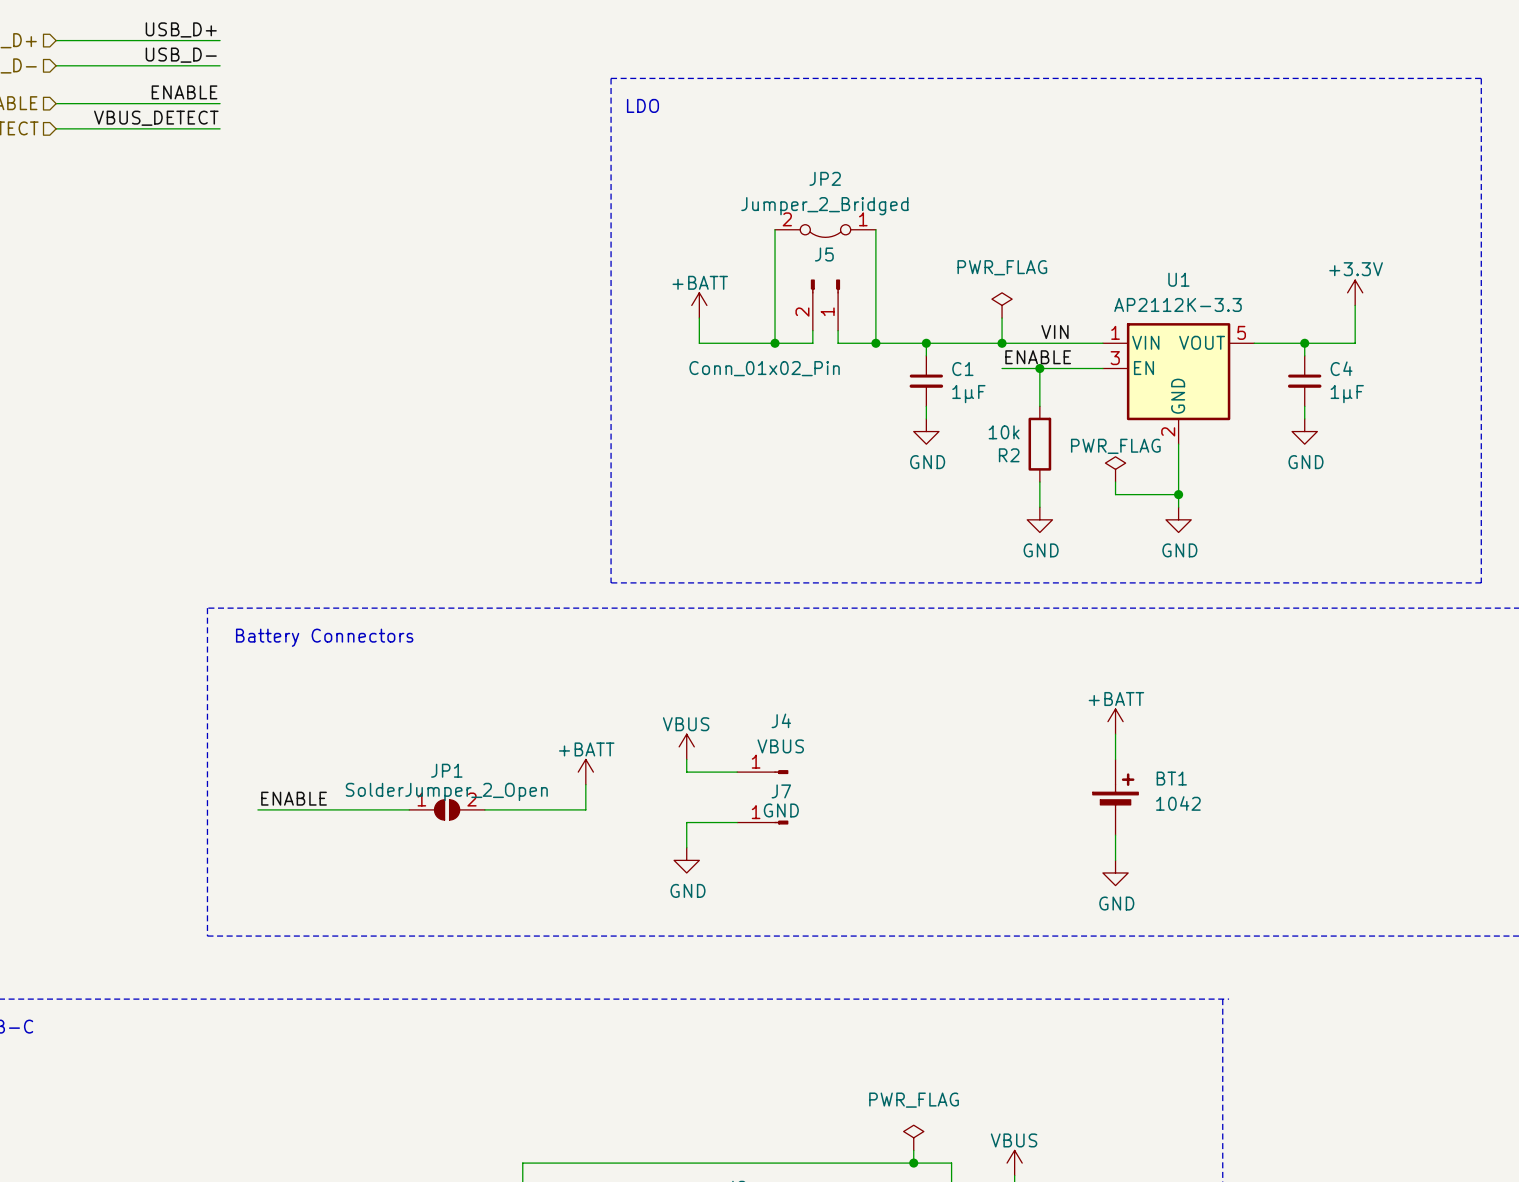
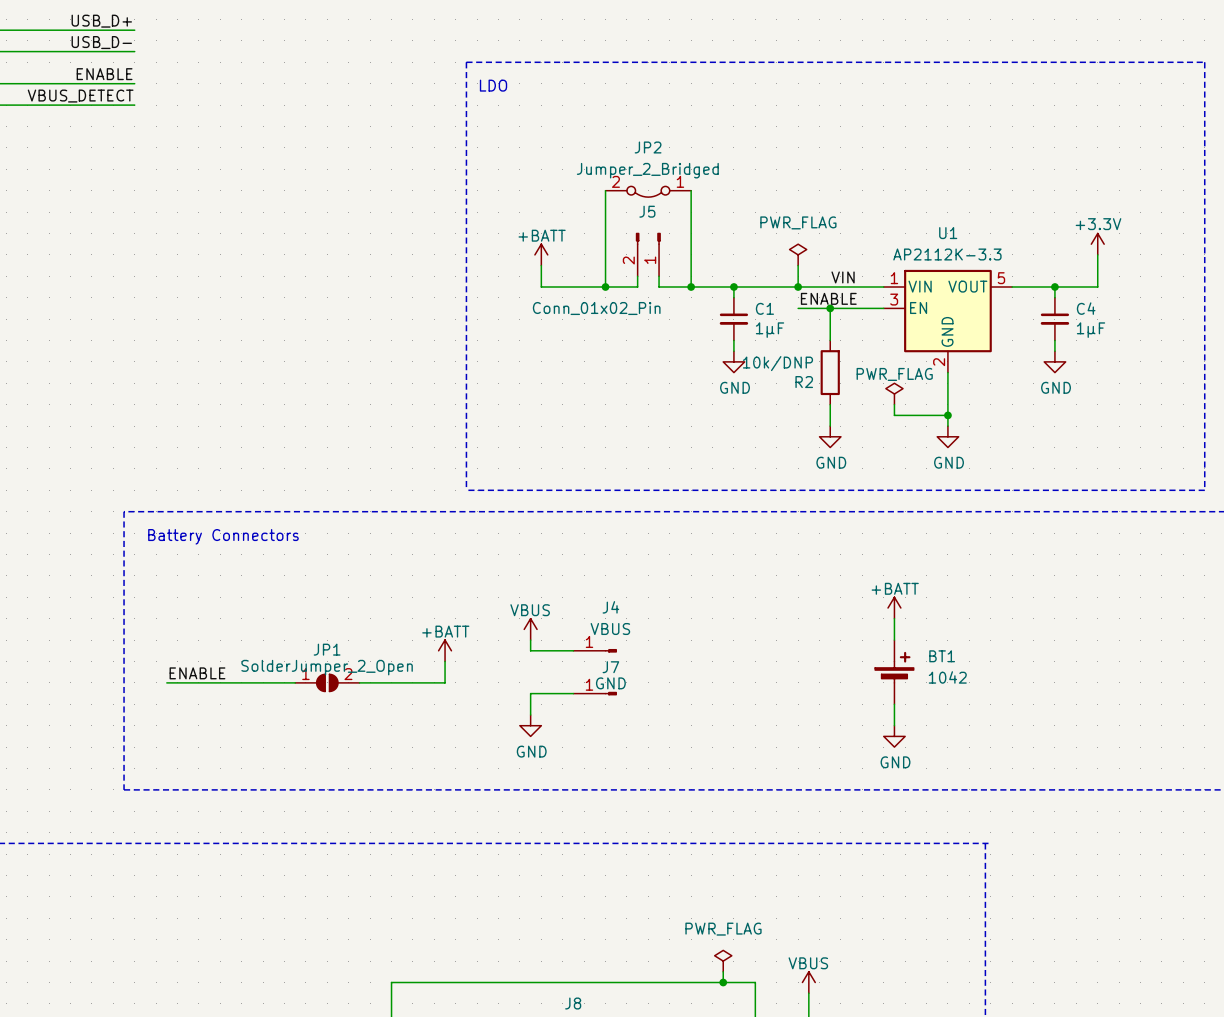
R2 value: 10k (1004, 432) -> 10k/DNP (777, 363)

